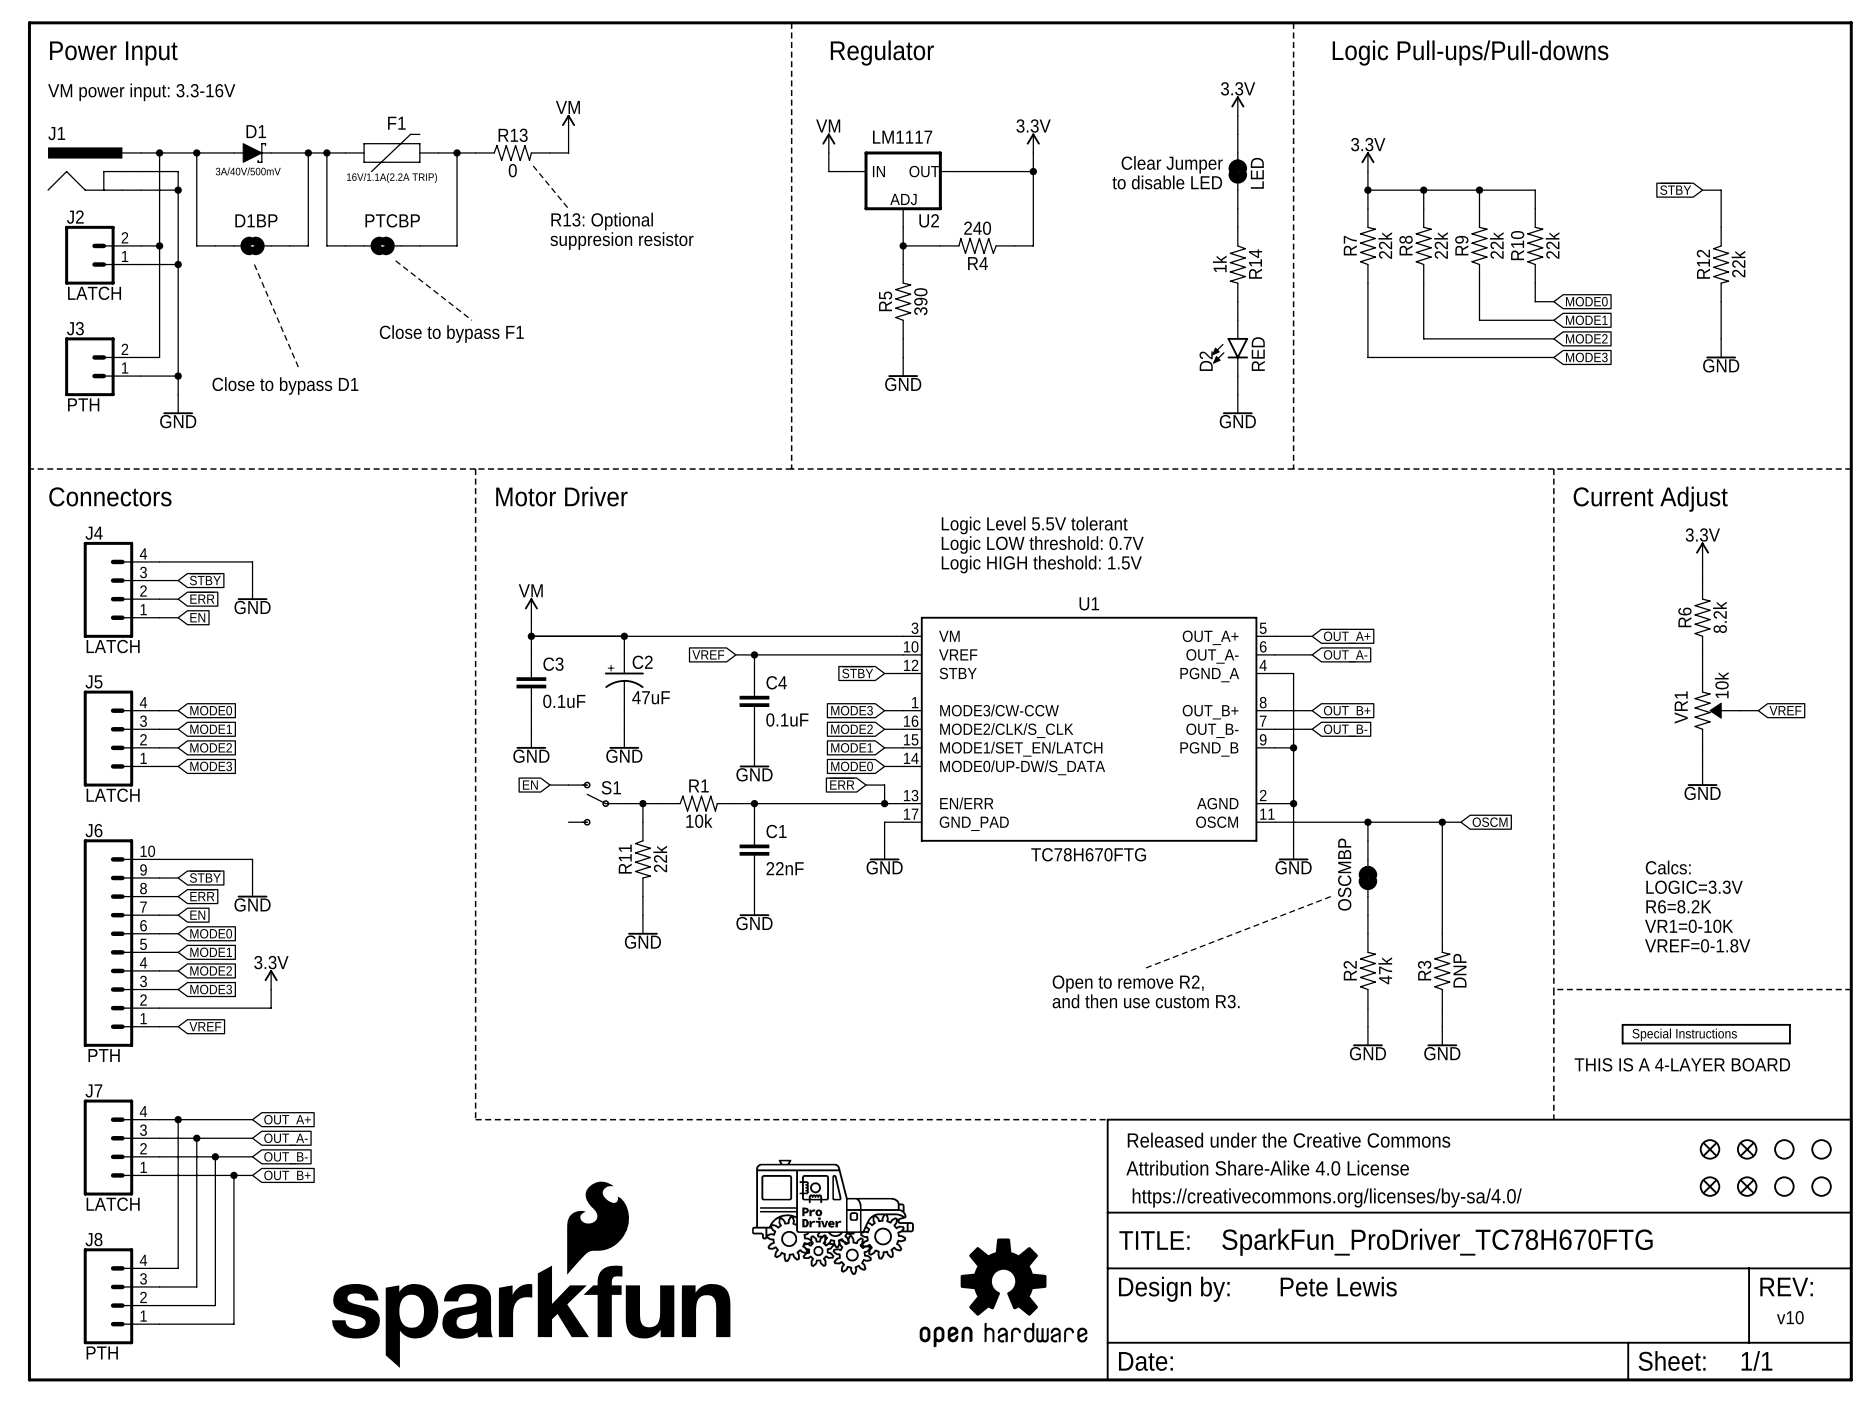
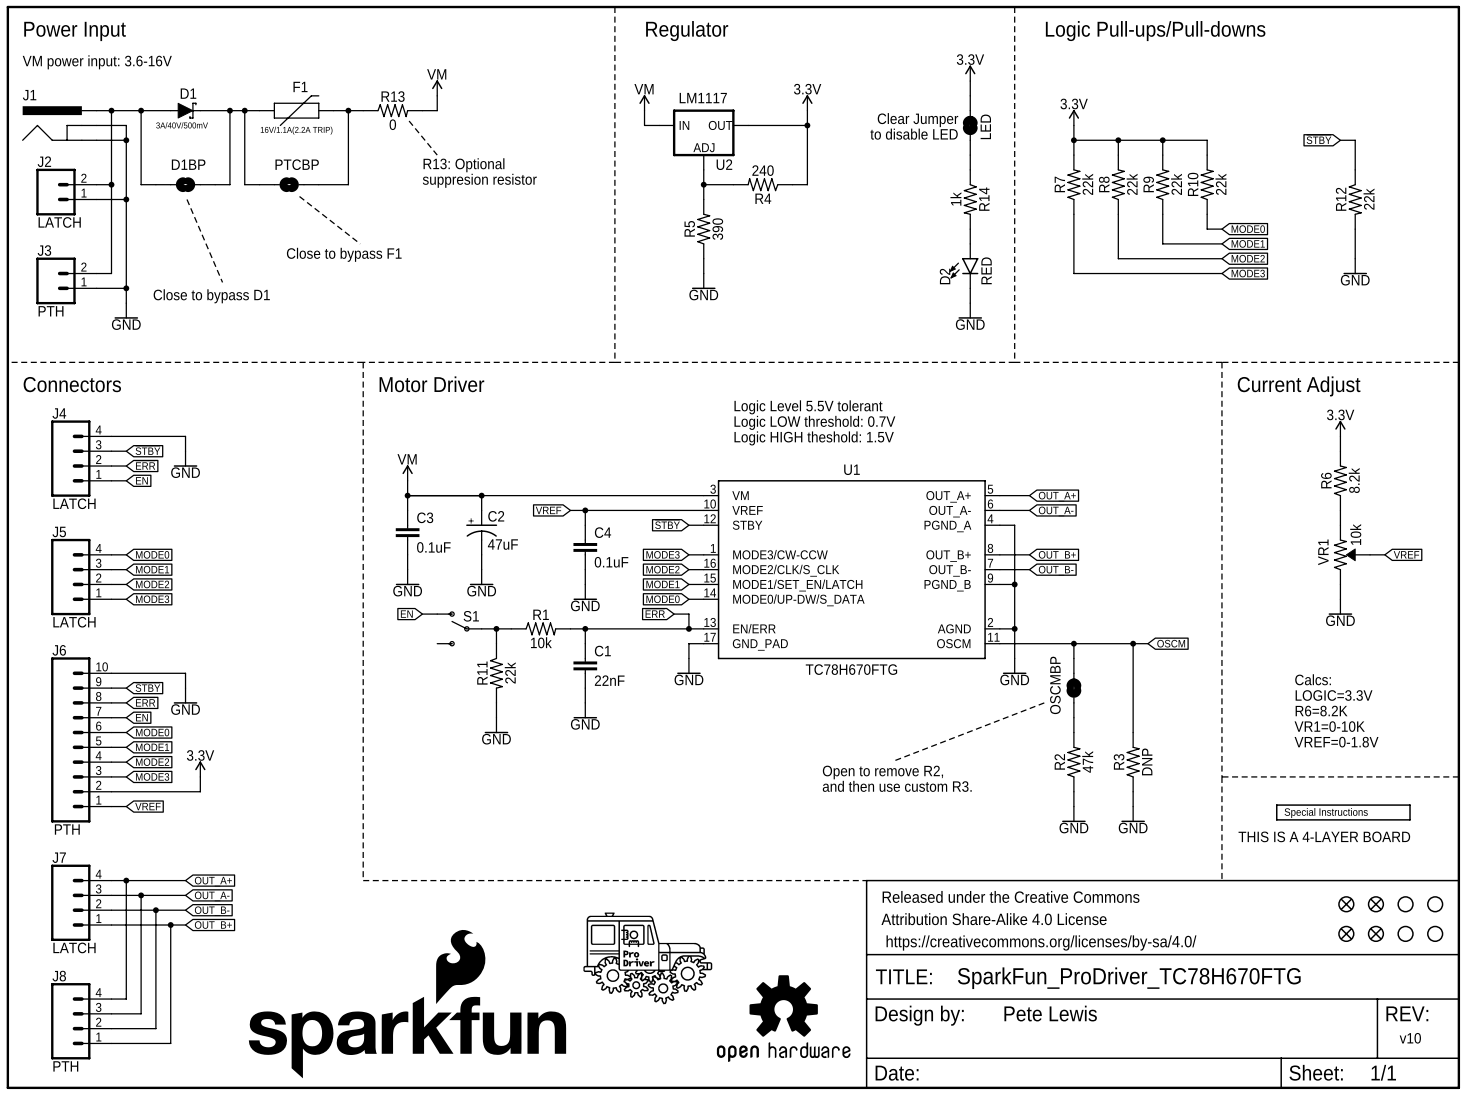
text: VM power input: 3.3-16V (141, 92) -> VM power input: 3.6-16V (97, 62)

